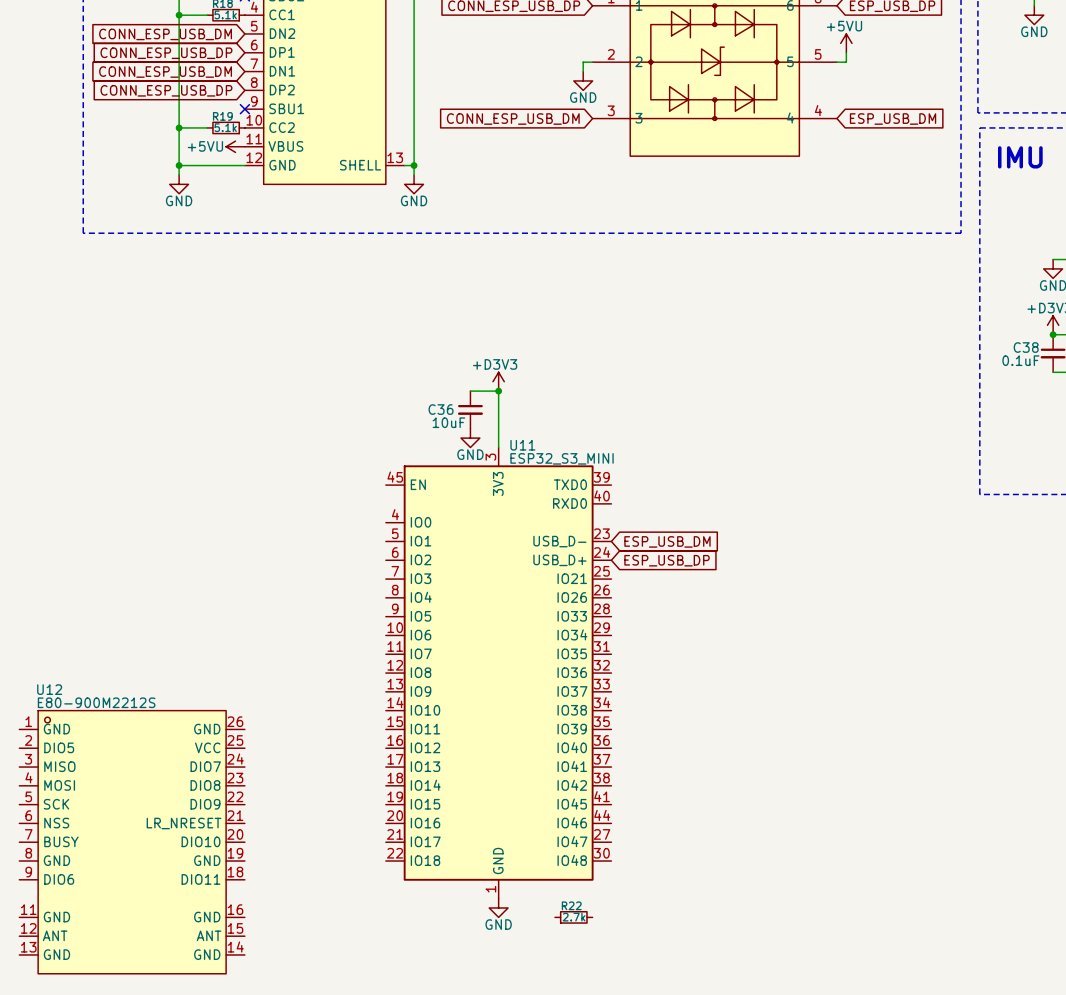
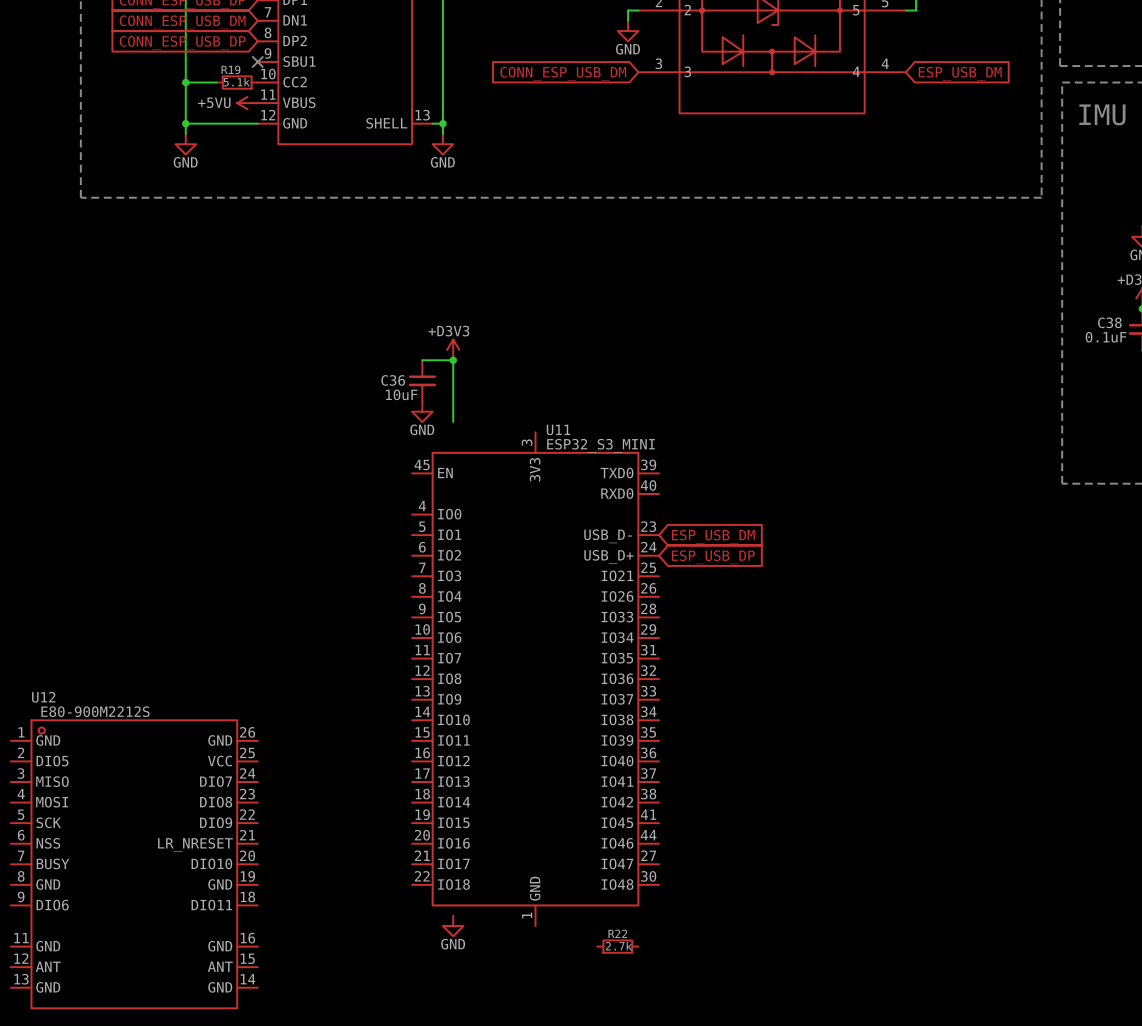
junction: none -> (453, 360)
power symbol position: +D3V3 (498, 381) -> +D3V3 (453, 349)
wire: (470, 391) (498, 391) (498, 447) -> (422, 360) (453, 360) (453, 421)
junction: (498, 391) -> none
C36 position: (470, 409) -> (422, 380)
power symbol position: GND (470, 438) -> GND (422, 411)
power symbol position: GND (498, 907) -> GND (453, 926)

